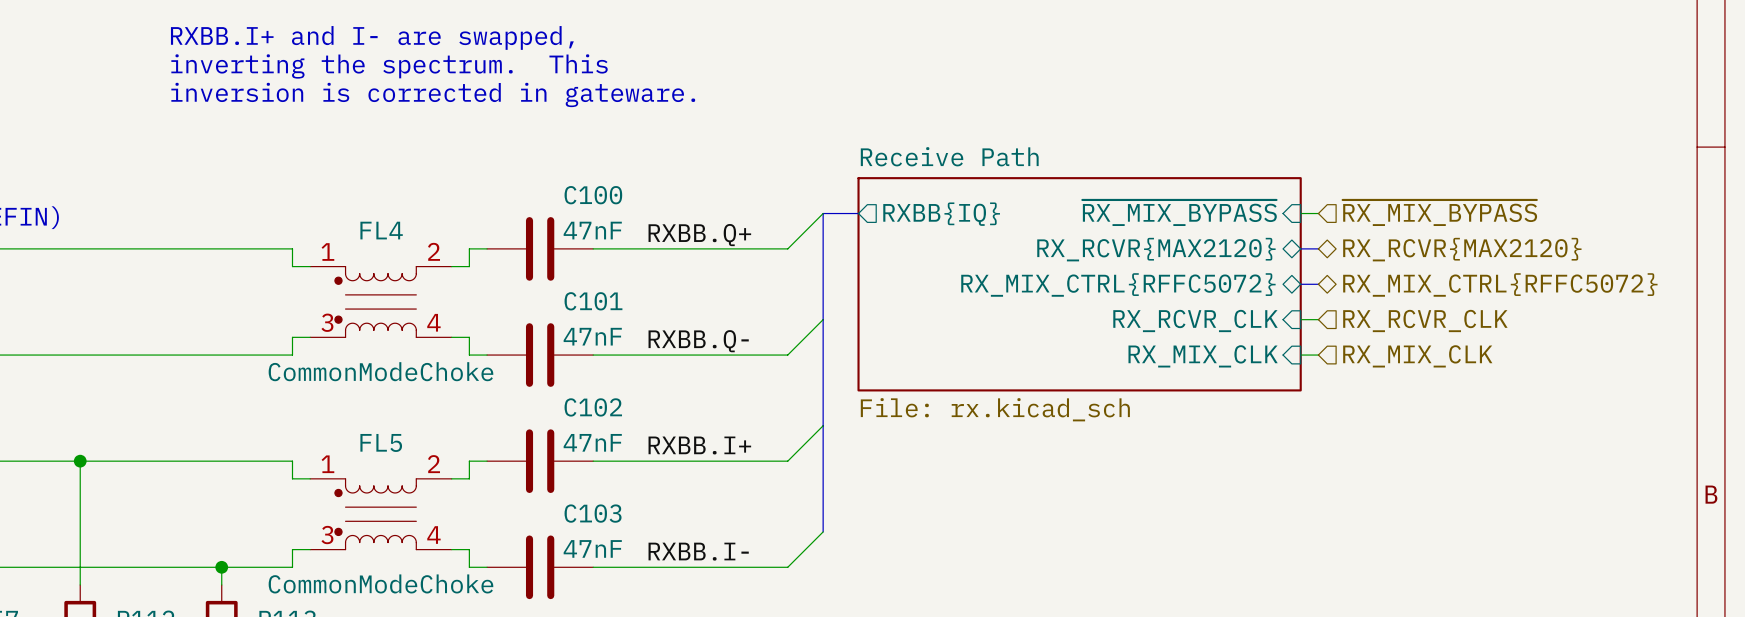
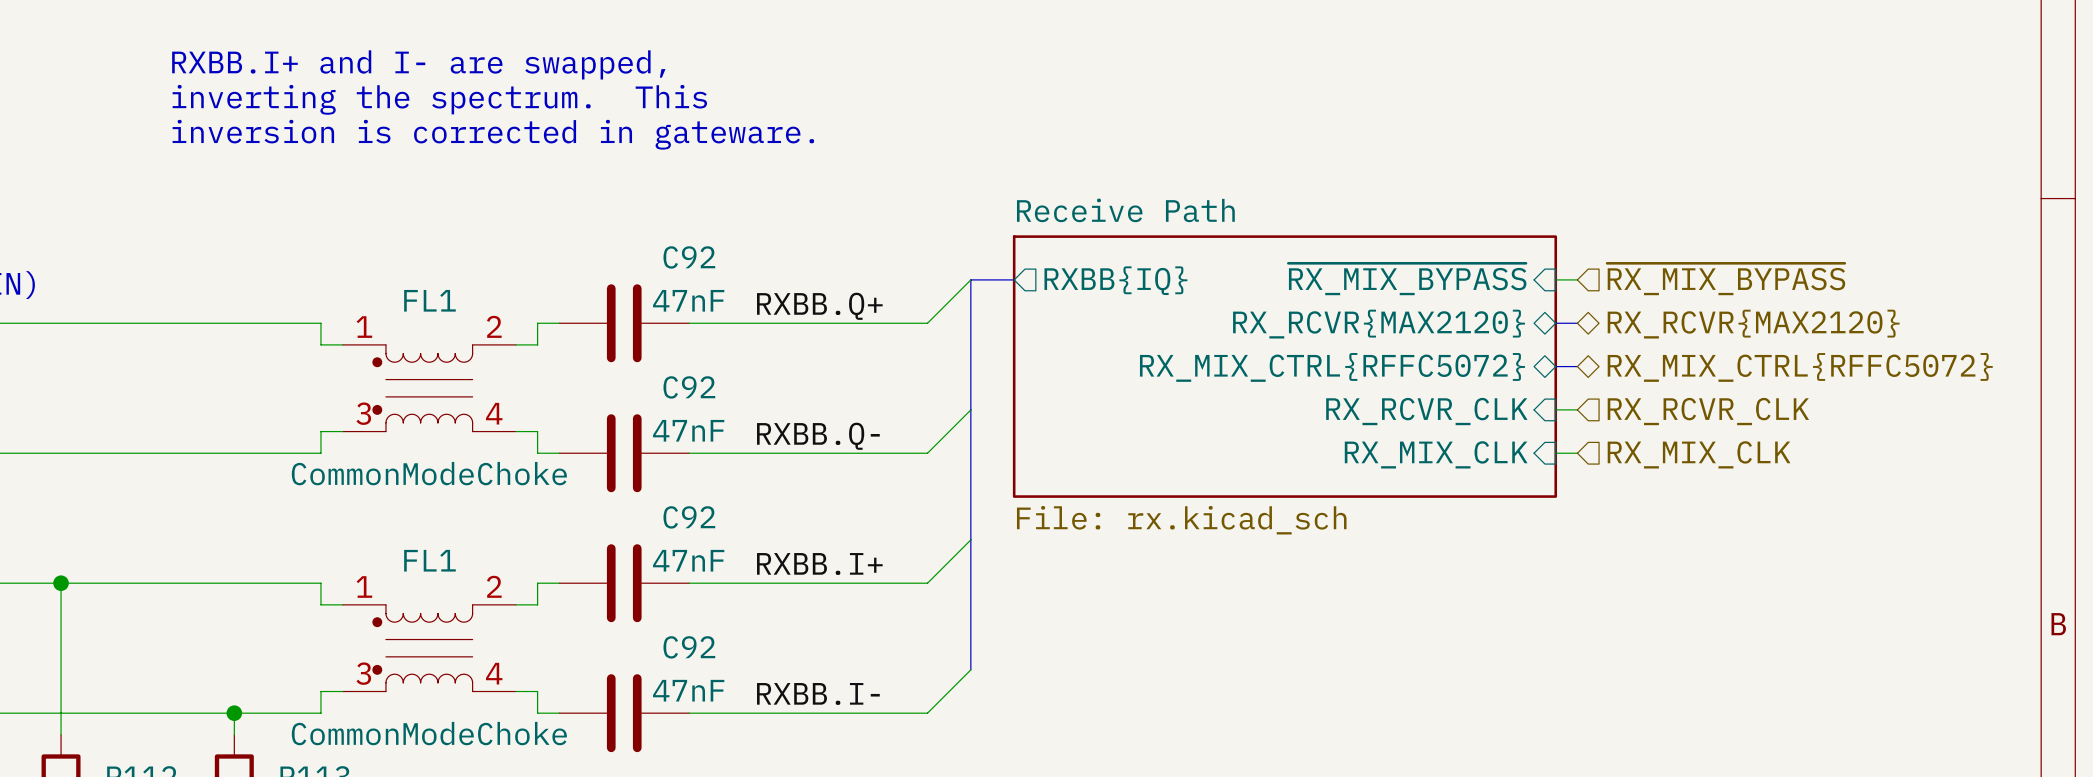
C100 name: C100 (593, 195) -> C92 (689, 257)
FL4 name: FL4 (381, 230) -> FL1 (429, 300)
C101 name: C101 (593, 301) -> C92 (689, 387)
C102 name: C102 (593, 407) -> C92 (689, 517)
FL5 name: FL5 (381, 442) -> FL1 (429, 560)
C103 name: C103 (593, 513) -> C92 (689, 647)

